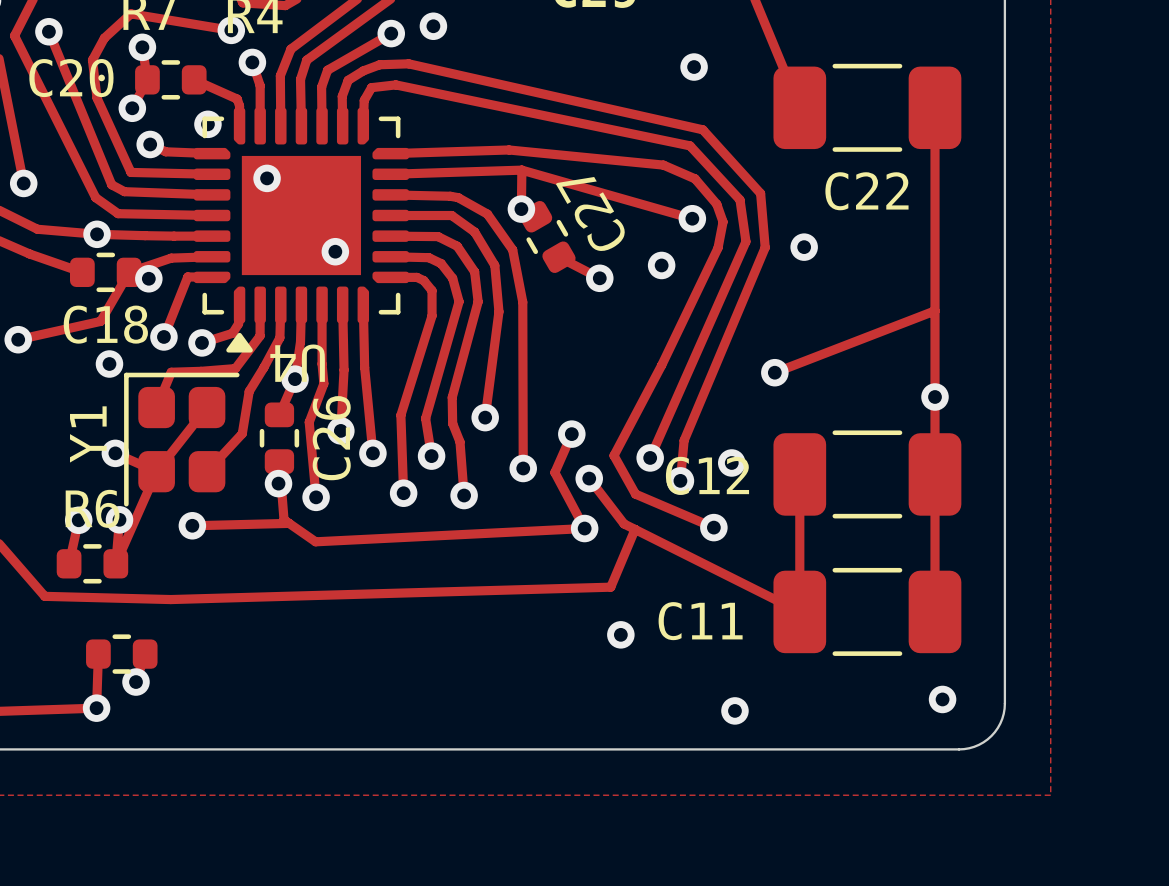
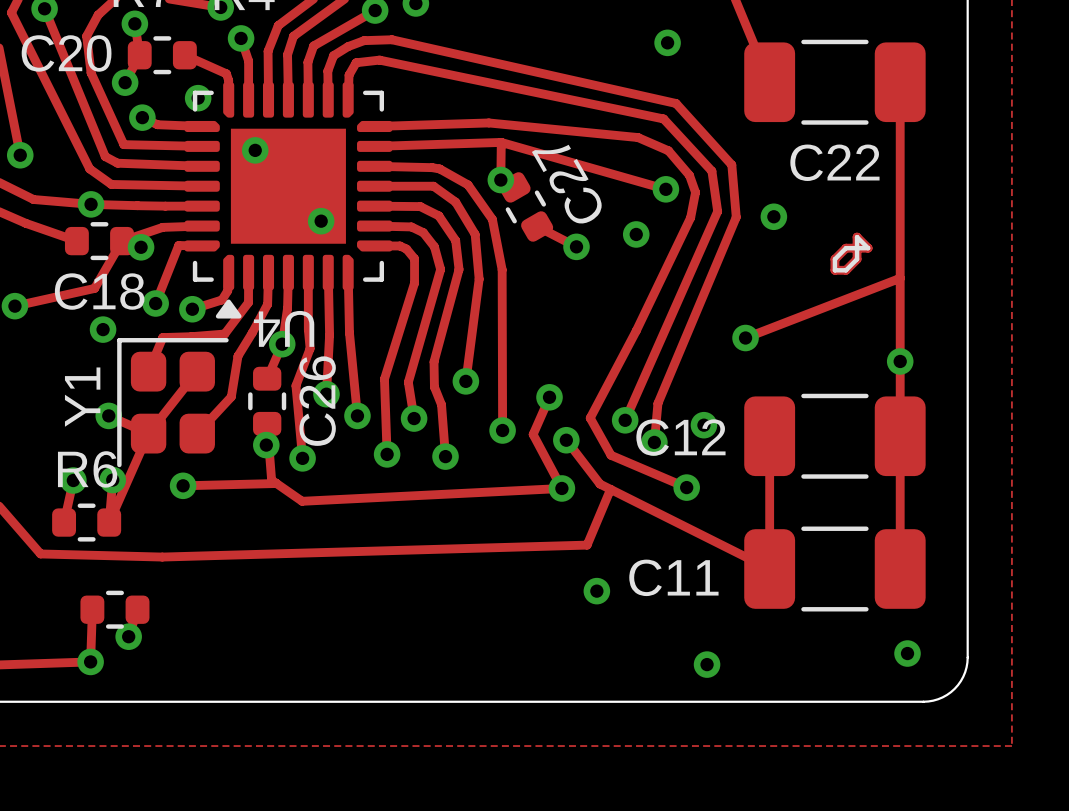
track: none -> (857, 237) (868, 248) (846, 248) (834, 259) (834, 270) (846, 270) (857, 259) (857, 237)
line: none -> (857, 237) (857, 259) (846, 270) (834, 270) (834, 259) (846, 248) (868, 248) (857, 237)

